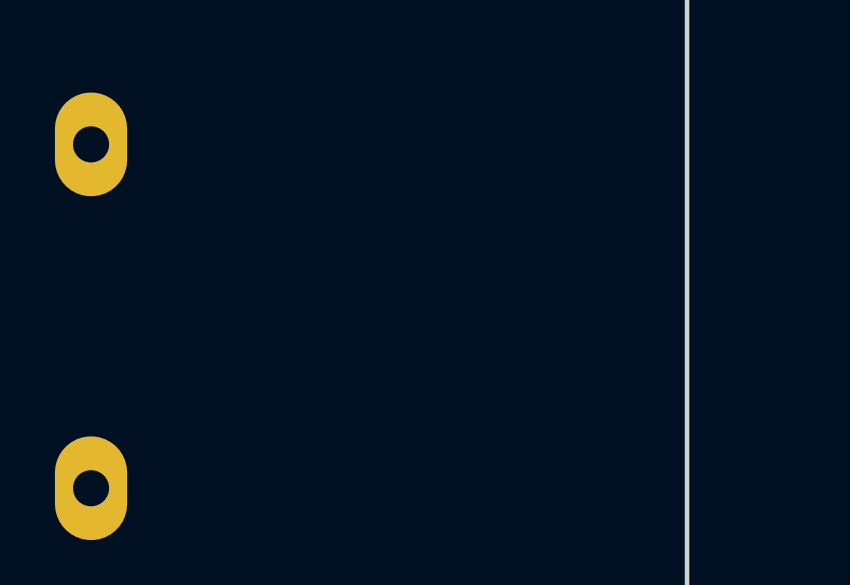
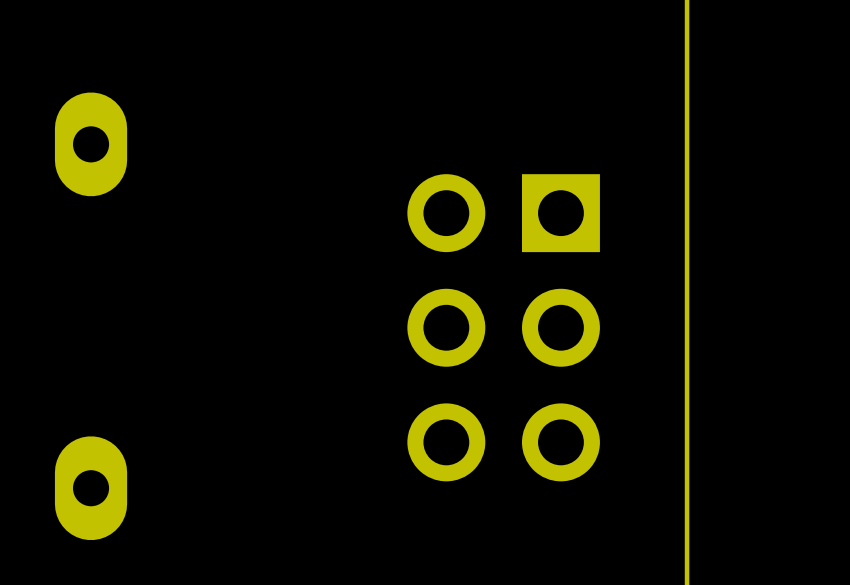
part: none -> (503, 327)

